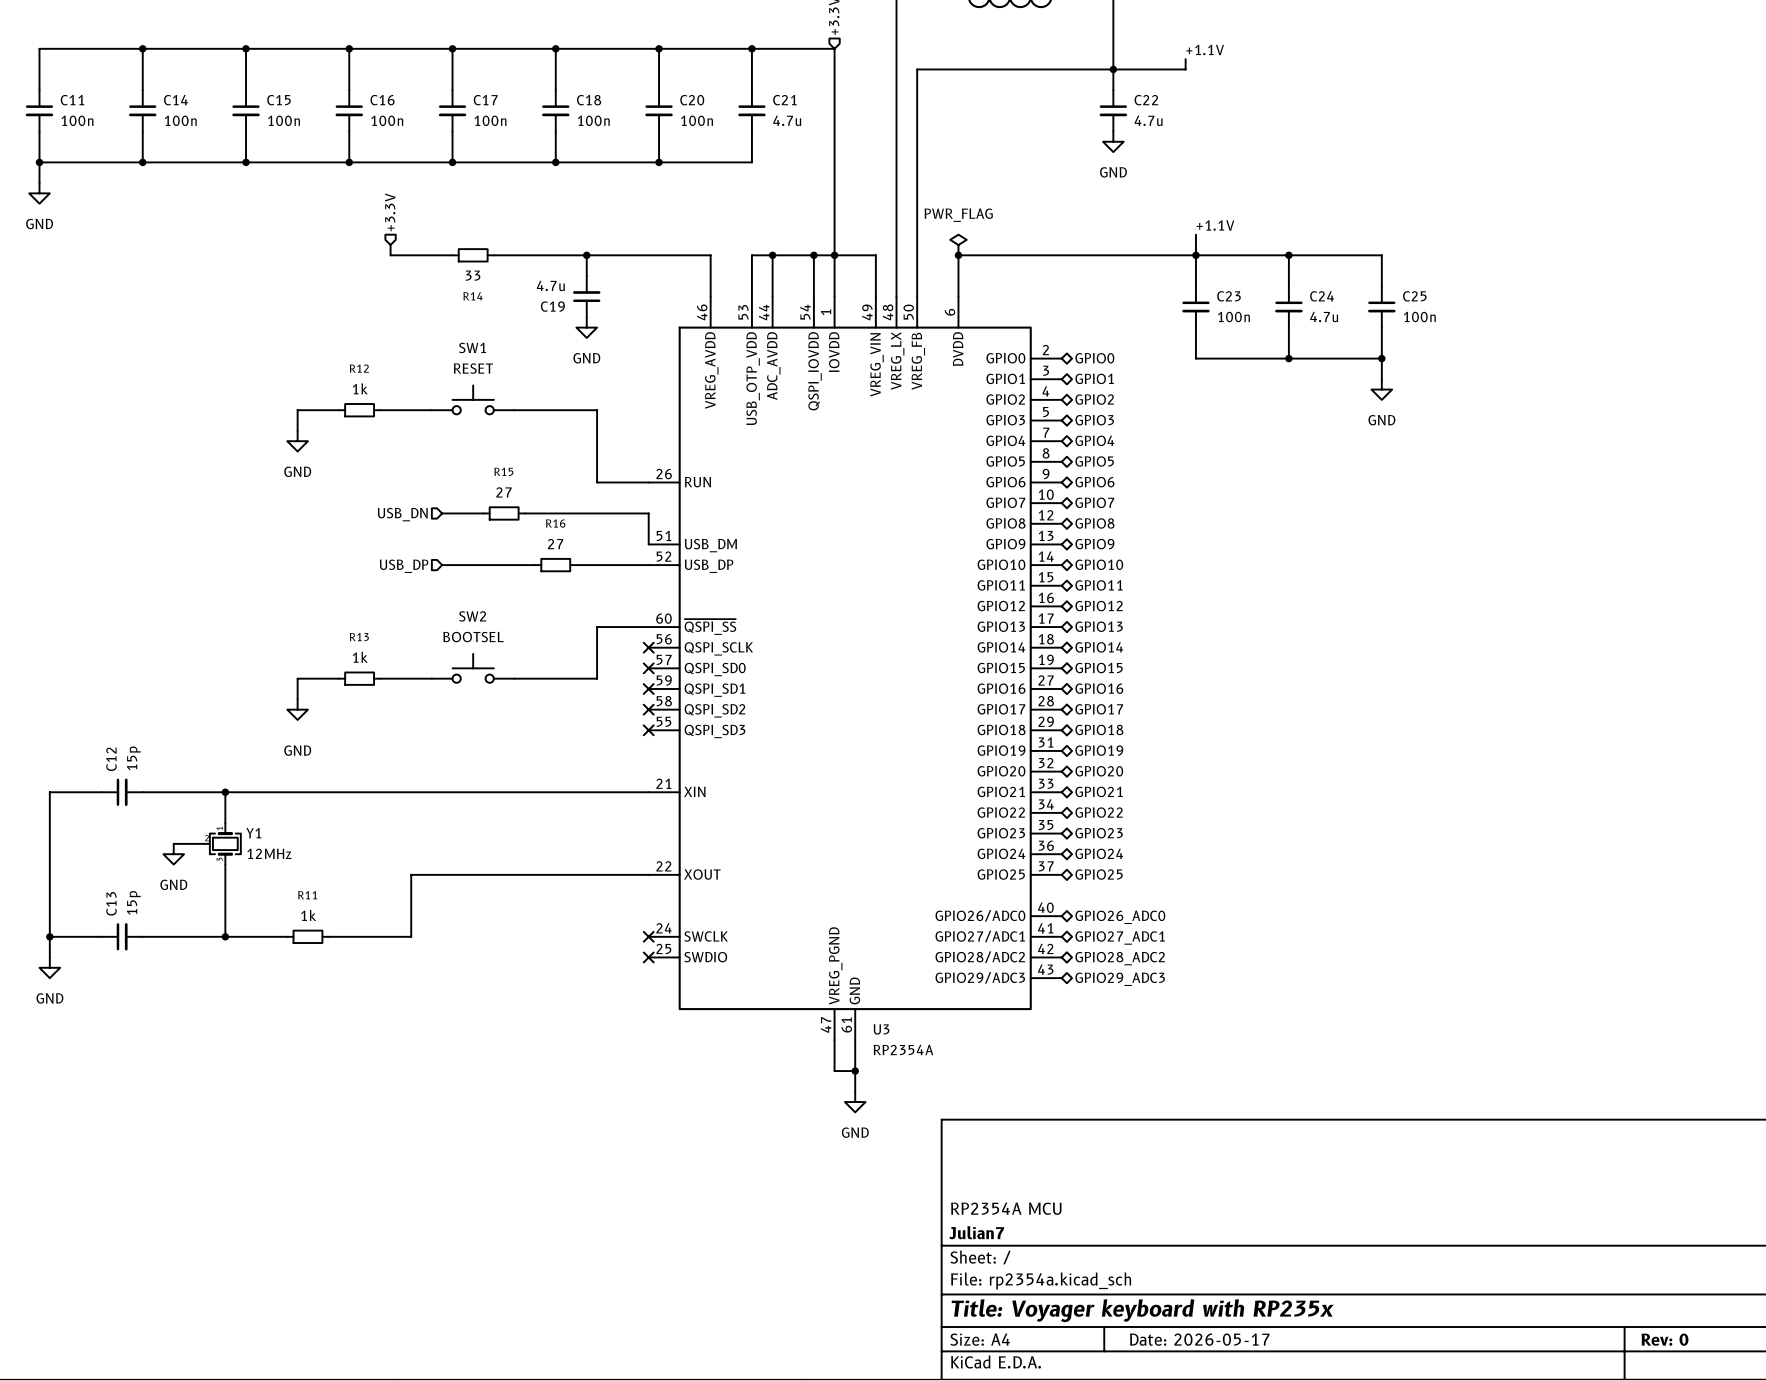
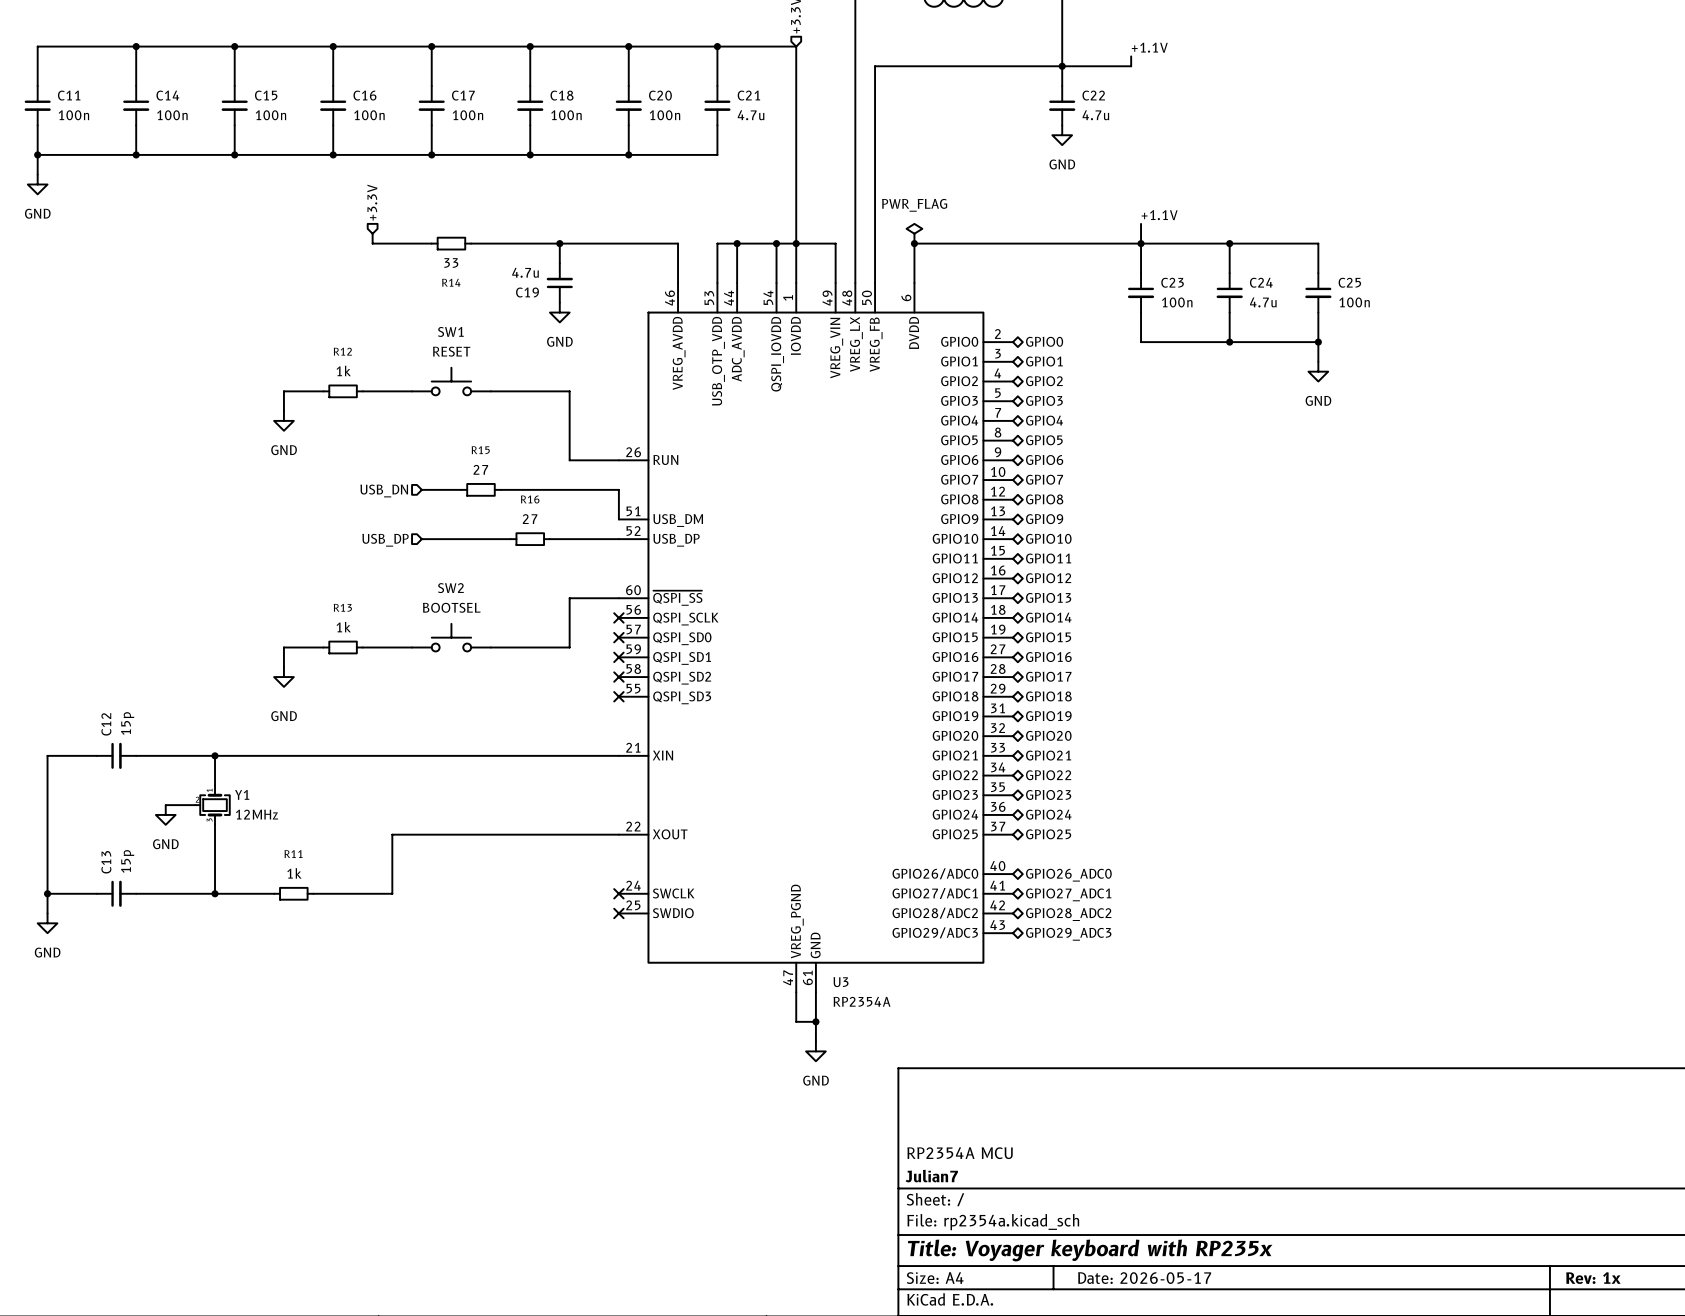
title block: Rev: 0 (1664, 1339) -> Rev: 1x (1593, 1278)

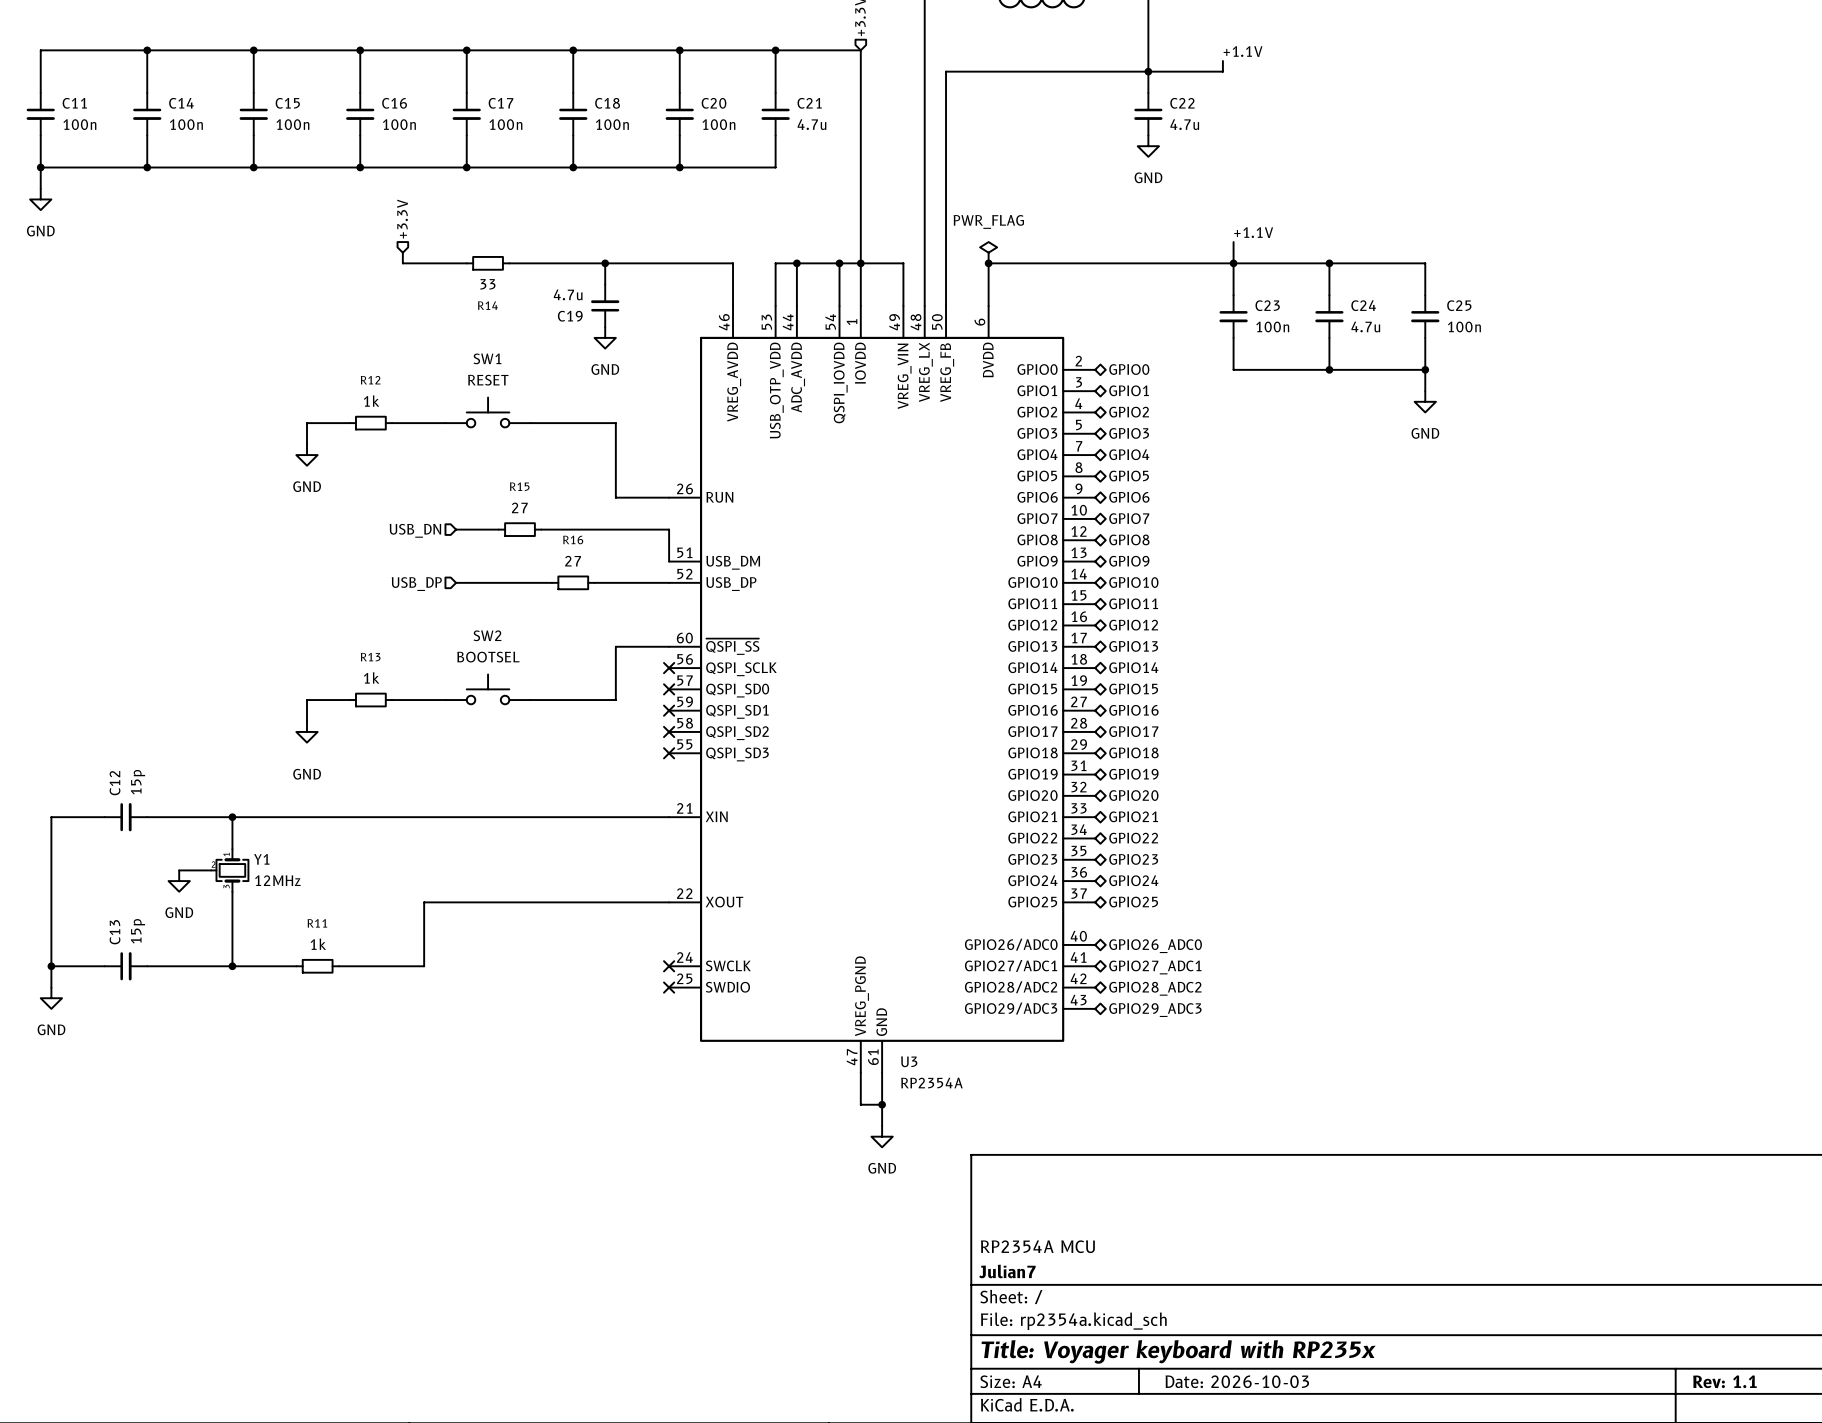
title block: Date: 2026-05-17 (1144, 1278) -> Date: 2026-10-03 (1237, 1381)
title block: Rev: 1x (1593, 1278) -> Rev: 1.1 (1724, 1381)

